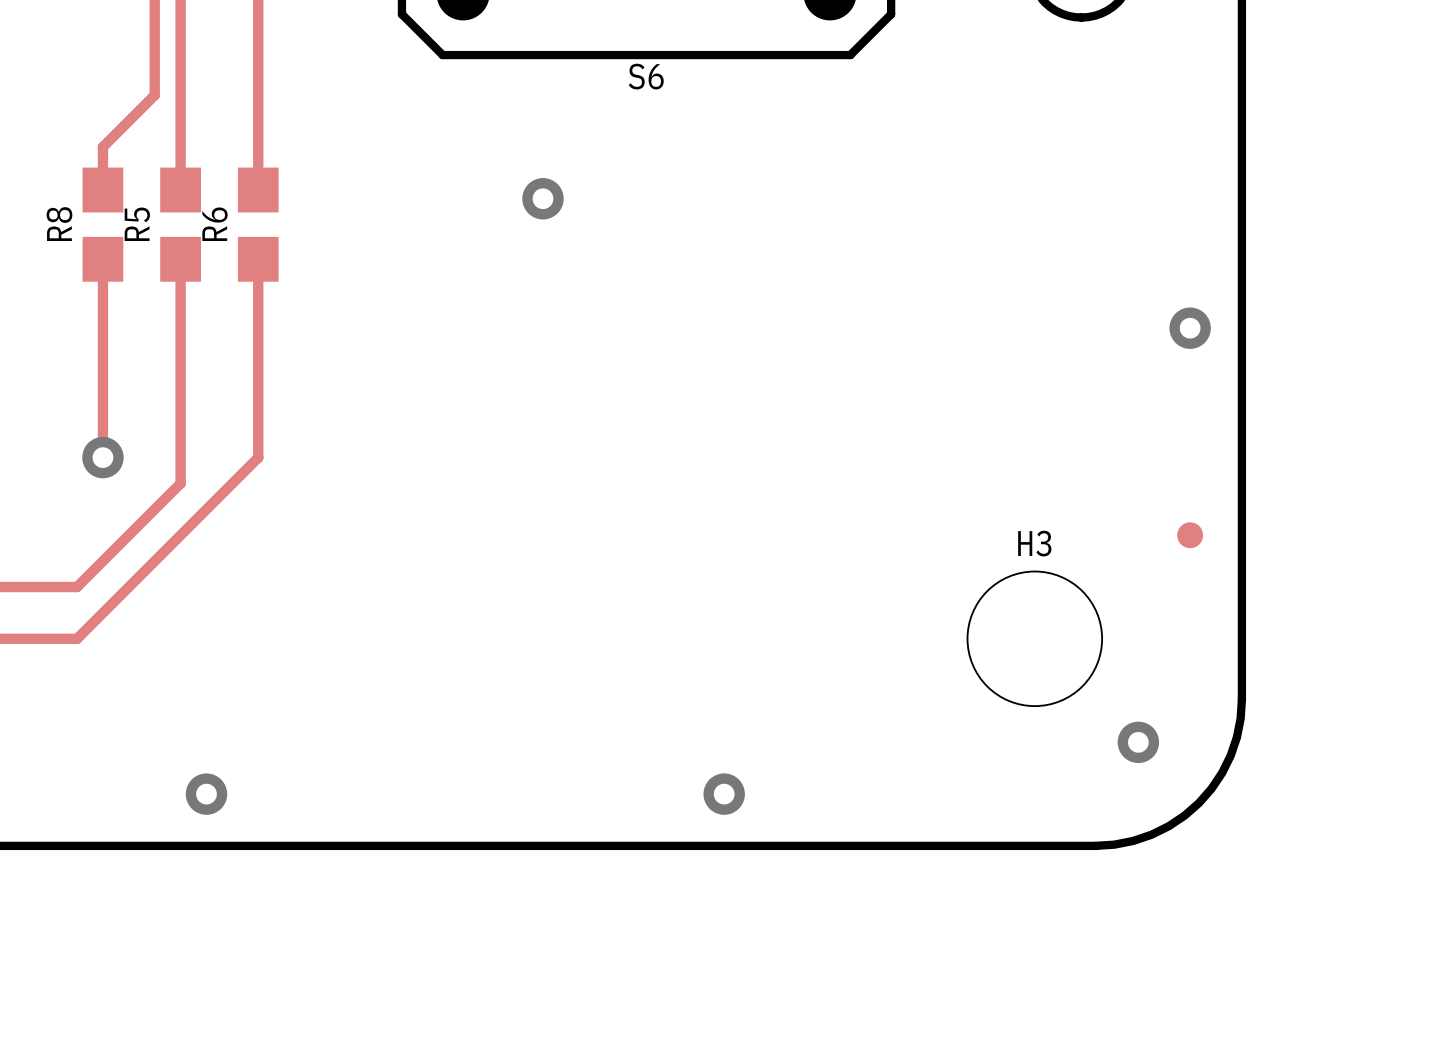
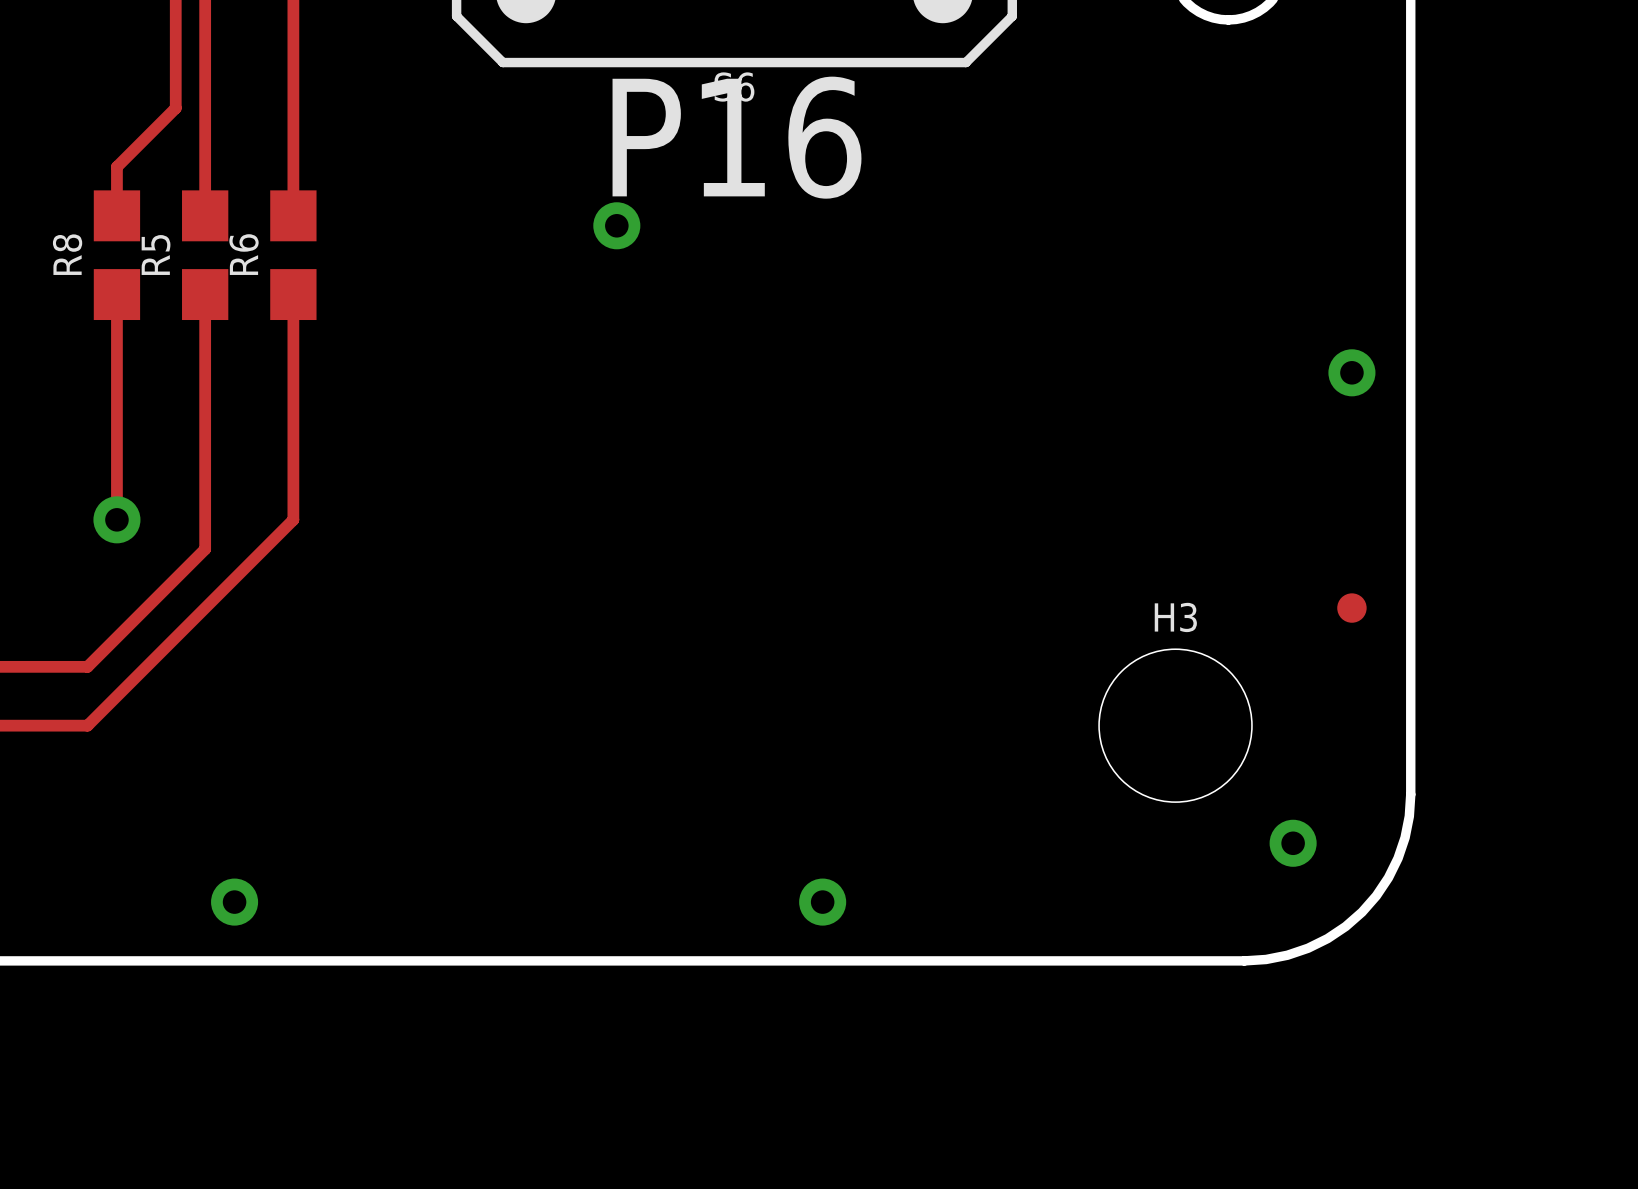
text: none -> P16 (737, 137)

